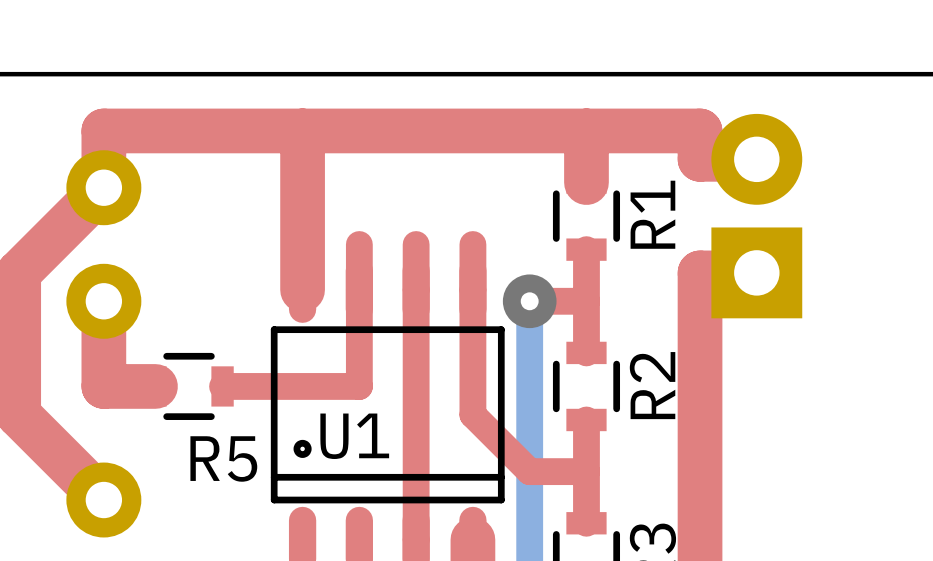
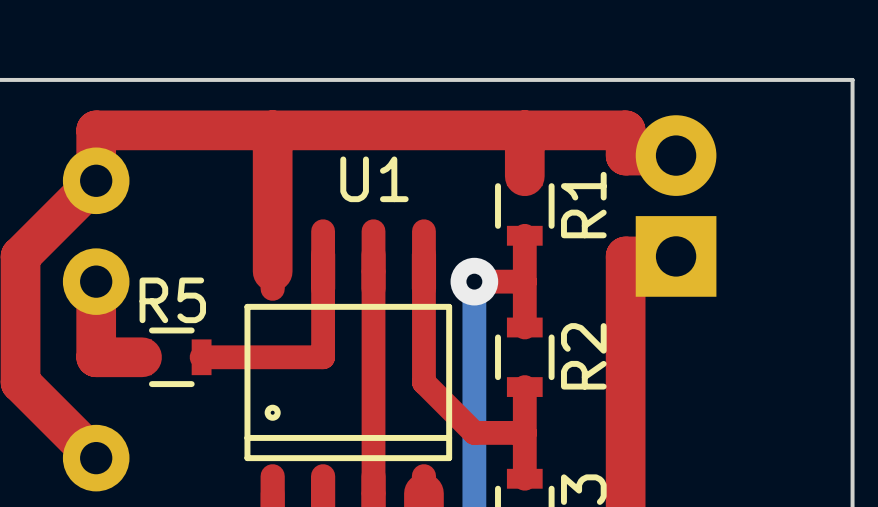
U1 name position: U1 (354, 436) -> U1 (374, 179)
R5 name position: R5 (223, 458) -> R5 (172, 300)

